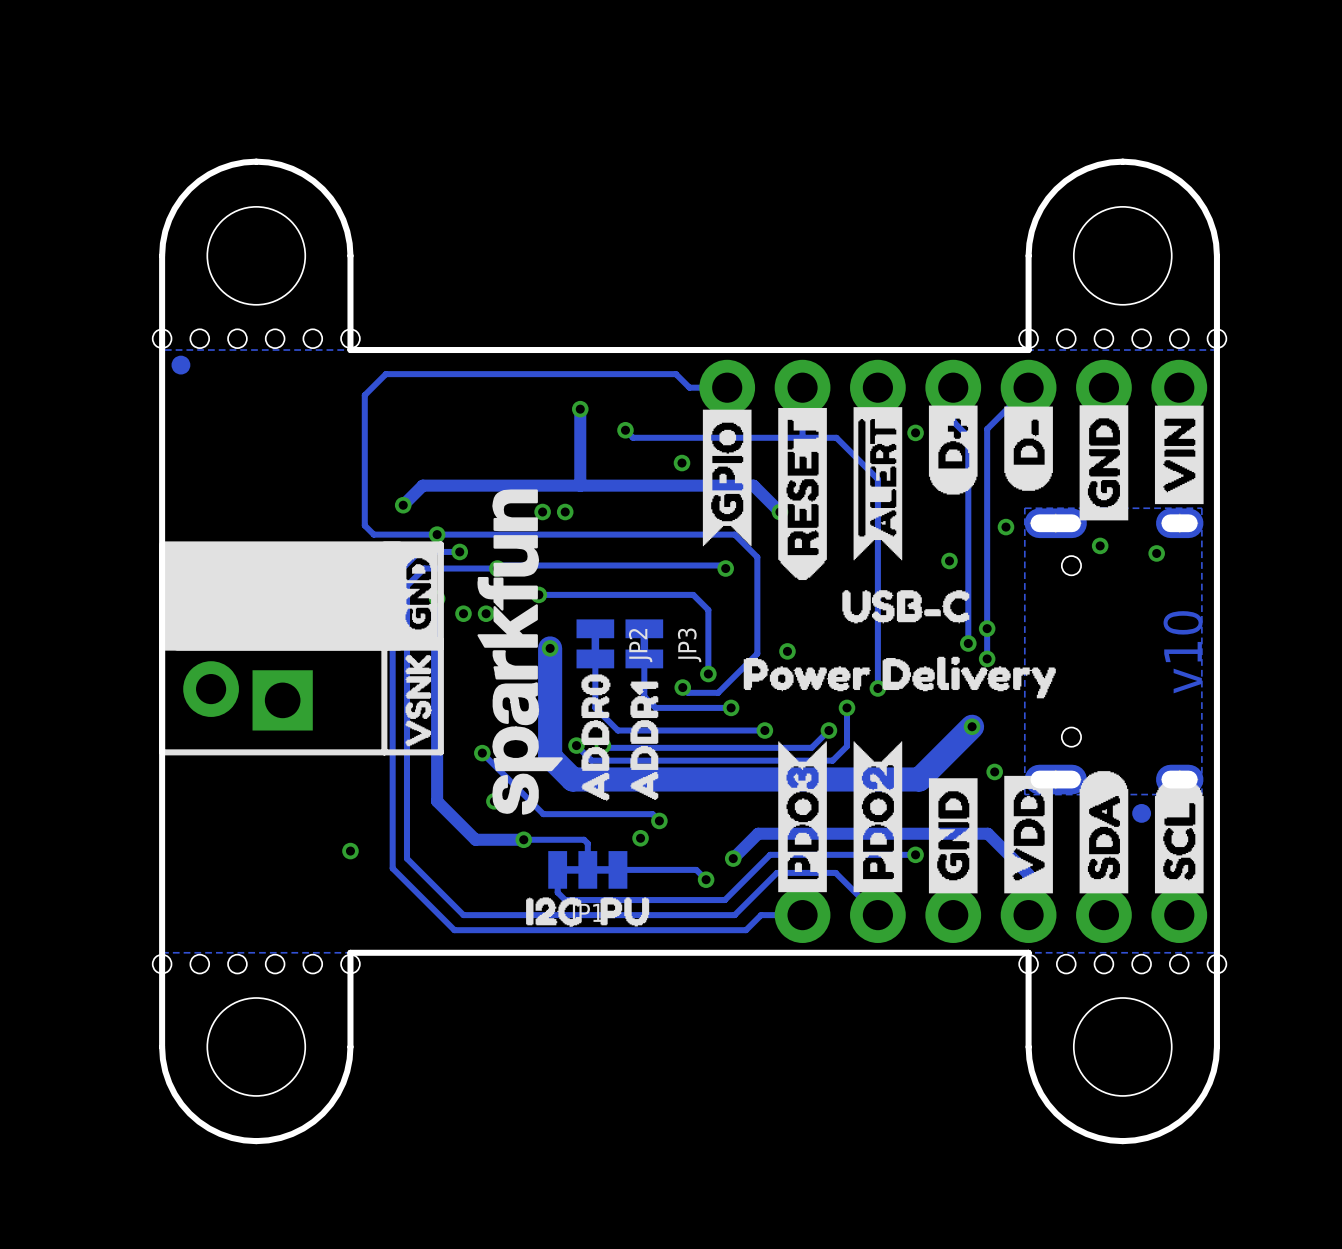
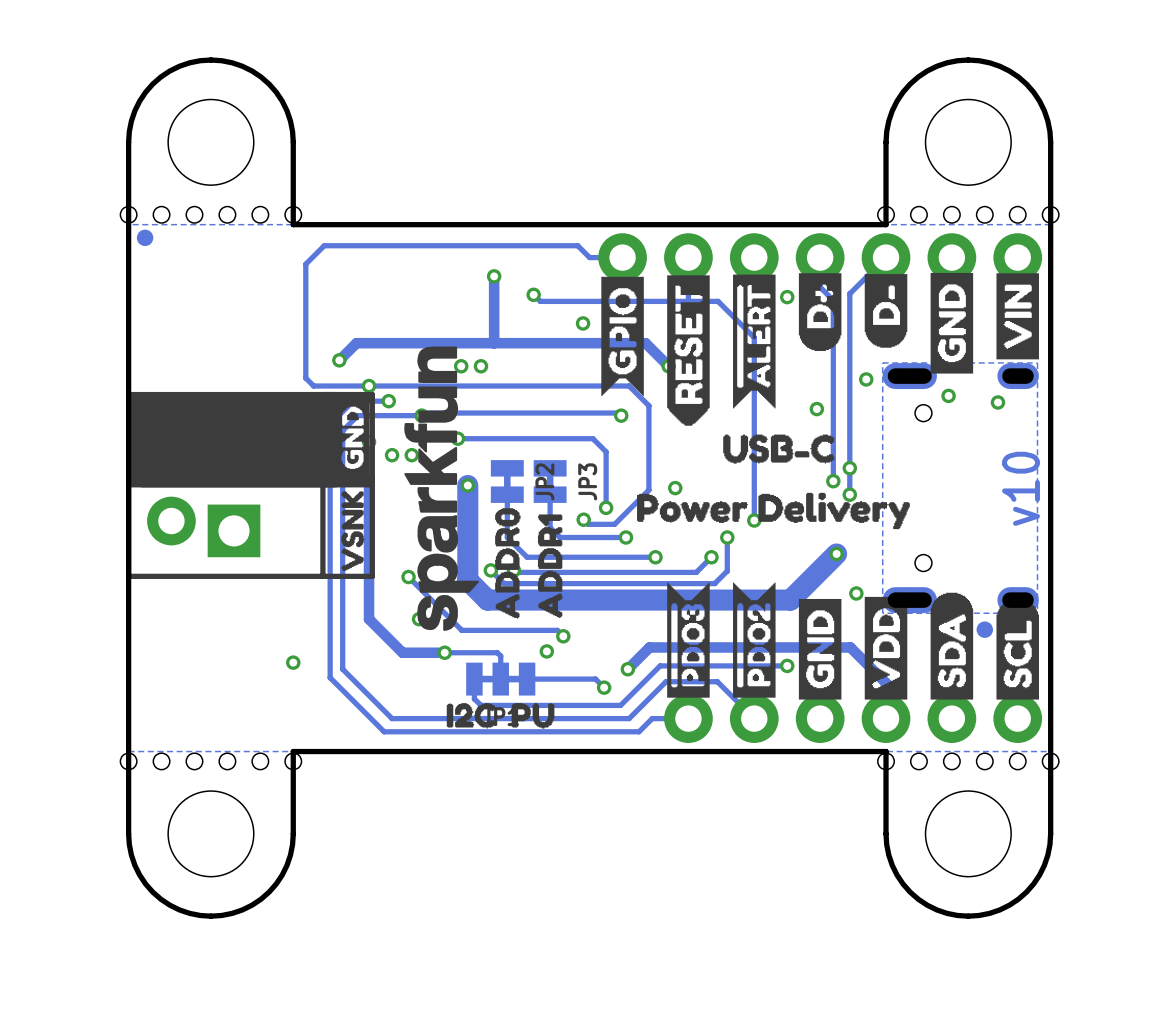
drawing shape: [778, 741, 827, 893] -> [667, 582, 710, 698]
drawing shape: [853, 741, 903, 893] -> [733, 582, 776, 698]

